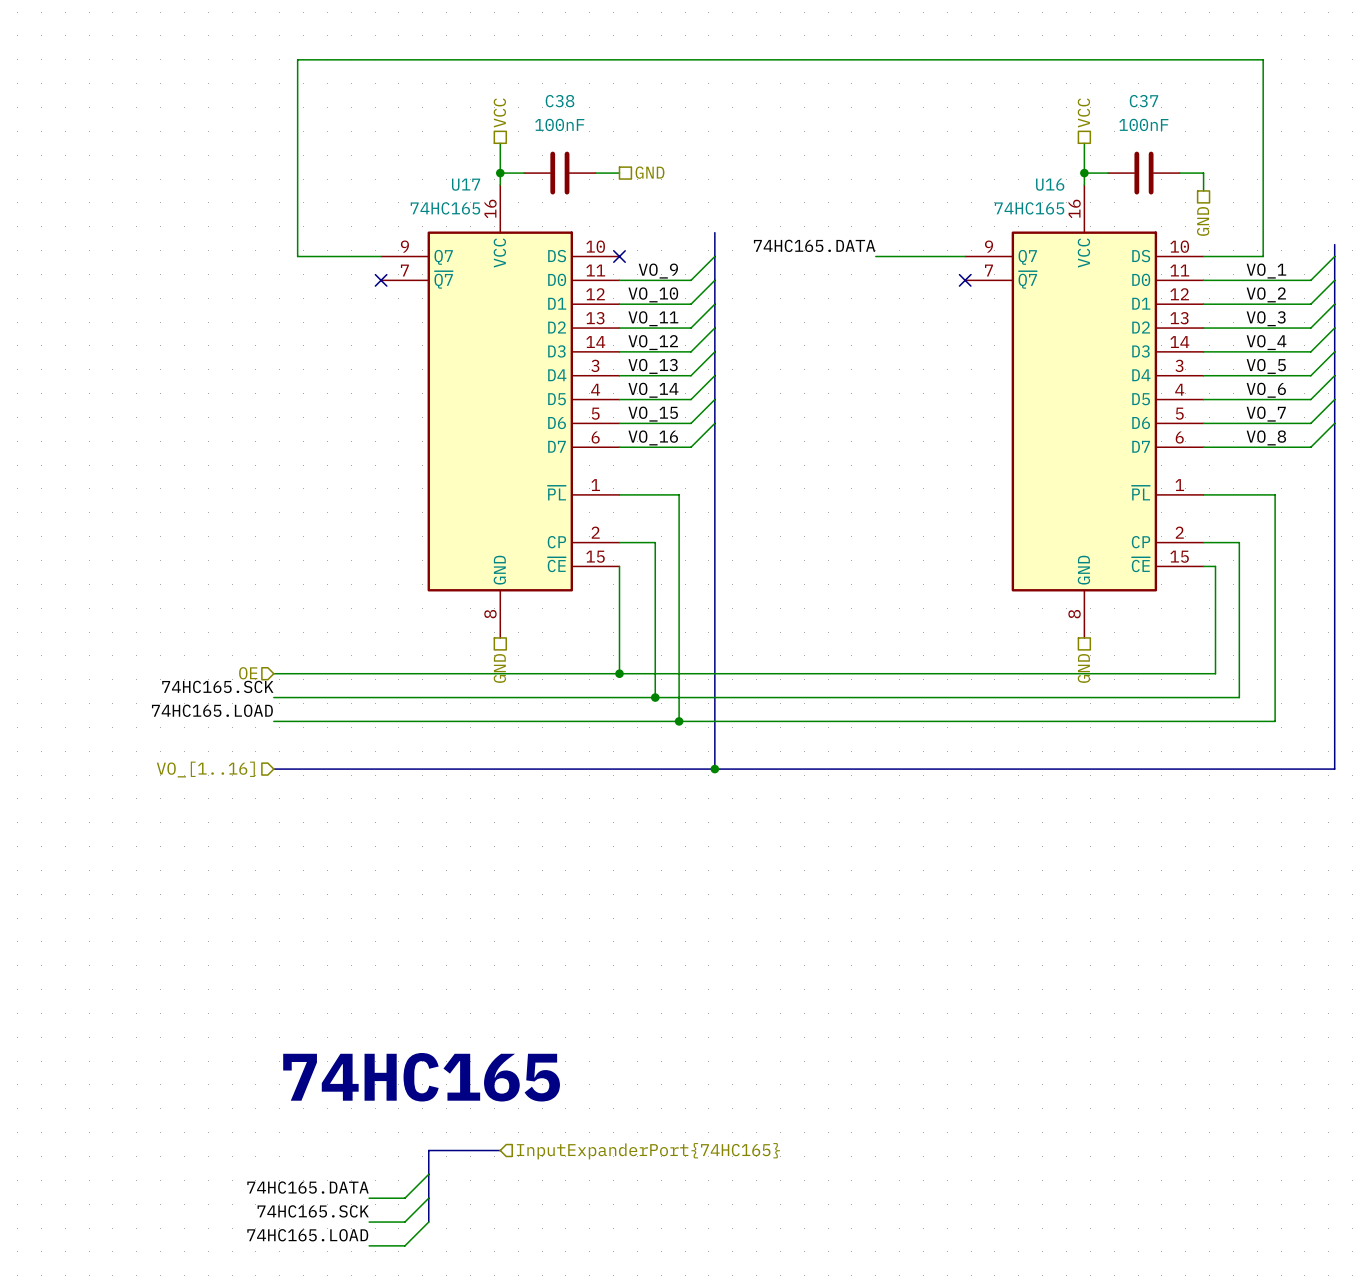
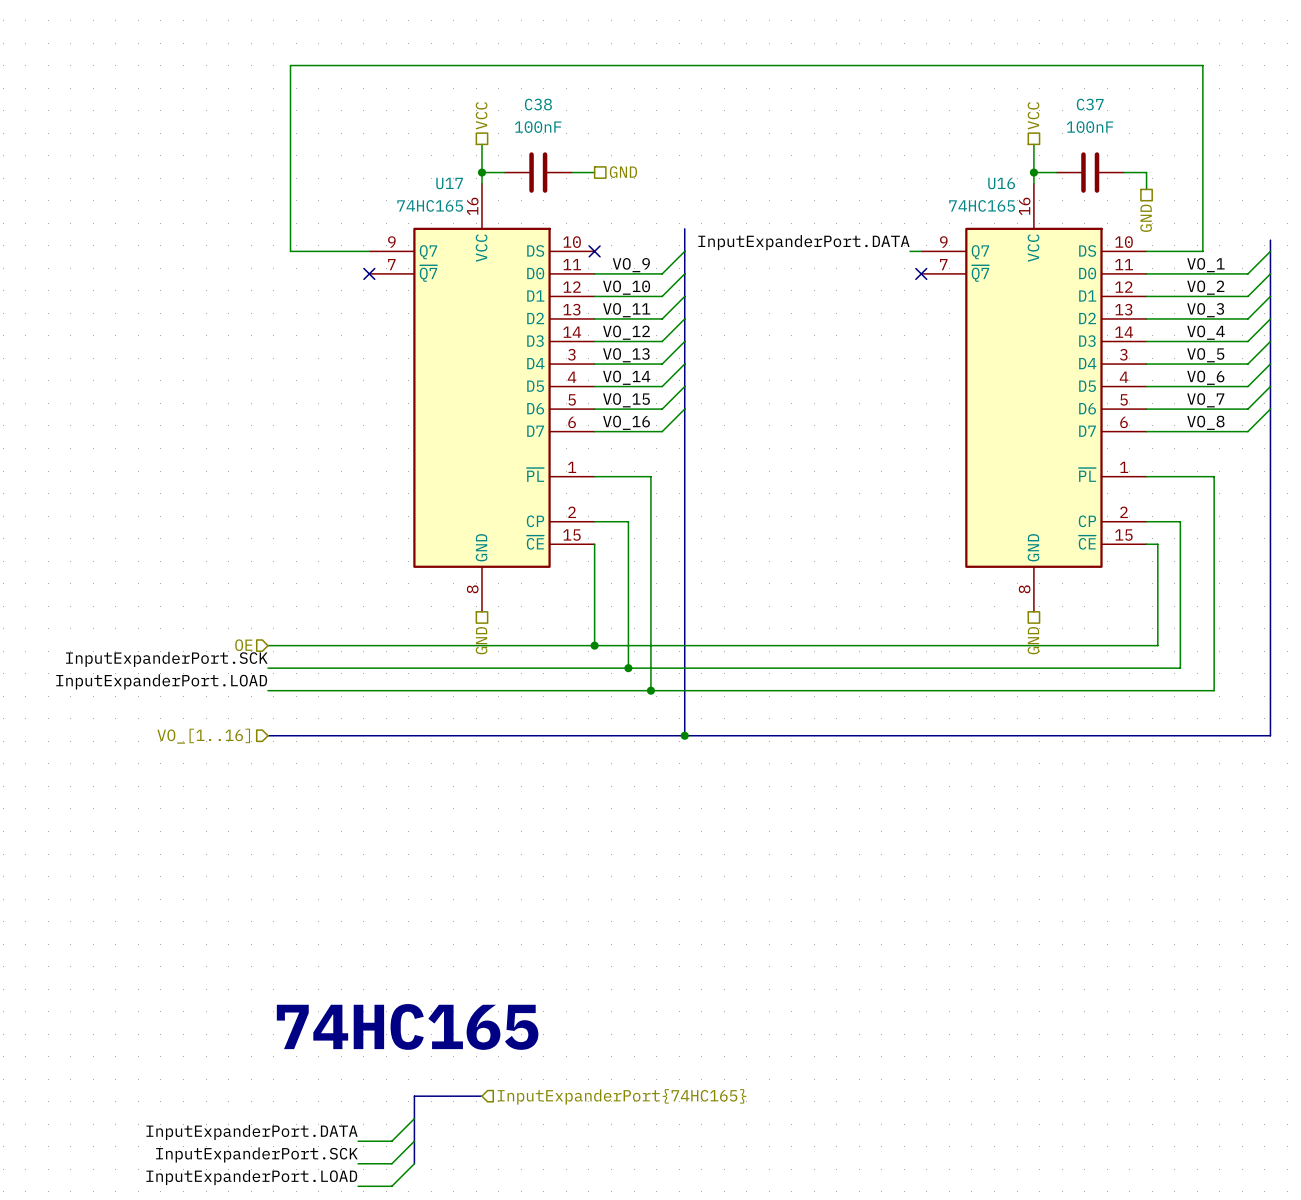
label: 74HC165.DATA (814, 245) -> none
label: none -> InputExpanderPort.DATA (803, 242)
wire: (875, 256) (953, 256) -> none
label: 74HC165.SCK (217, 686) -> InputExpanderPort.SCK (166, 659)
label: 74HC165.LOAD (212, 710) -> InputExpanderPort.LOAD (161, 681)
label: 74HC165.DATA (307, 1187) -> InputExpanderPort.DATA (252, 1132)
label: 74HC165.SCK (313, 1211) -> InputExpanderPort.SCK (256, 1154)
label: 74HC165.LOAD (307, 1235) -> InputExpanderPort.LOAD (251, 1177)

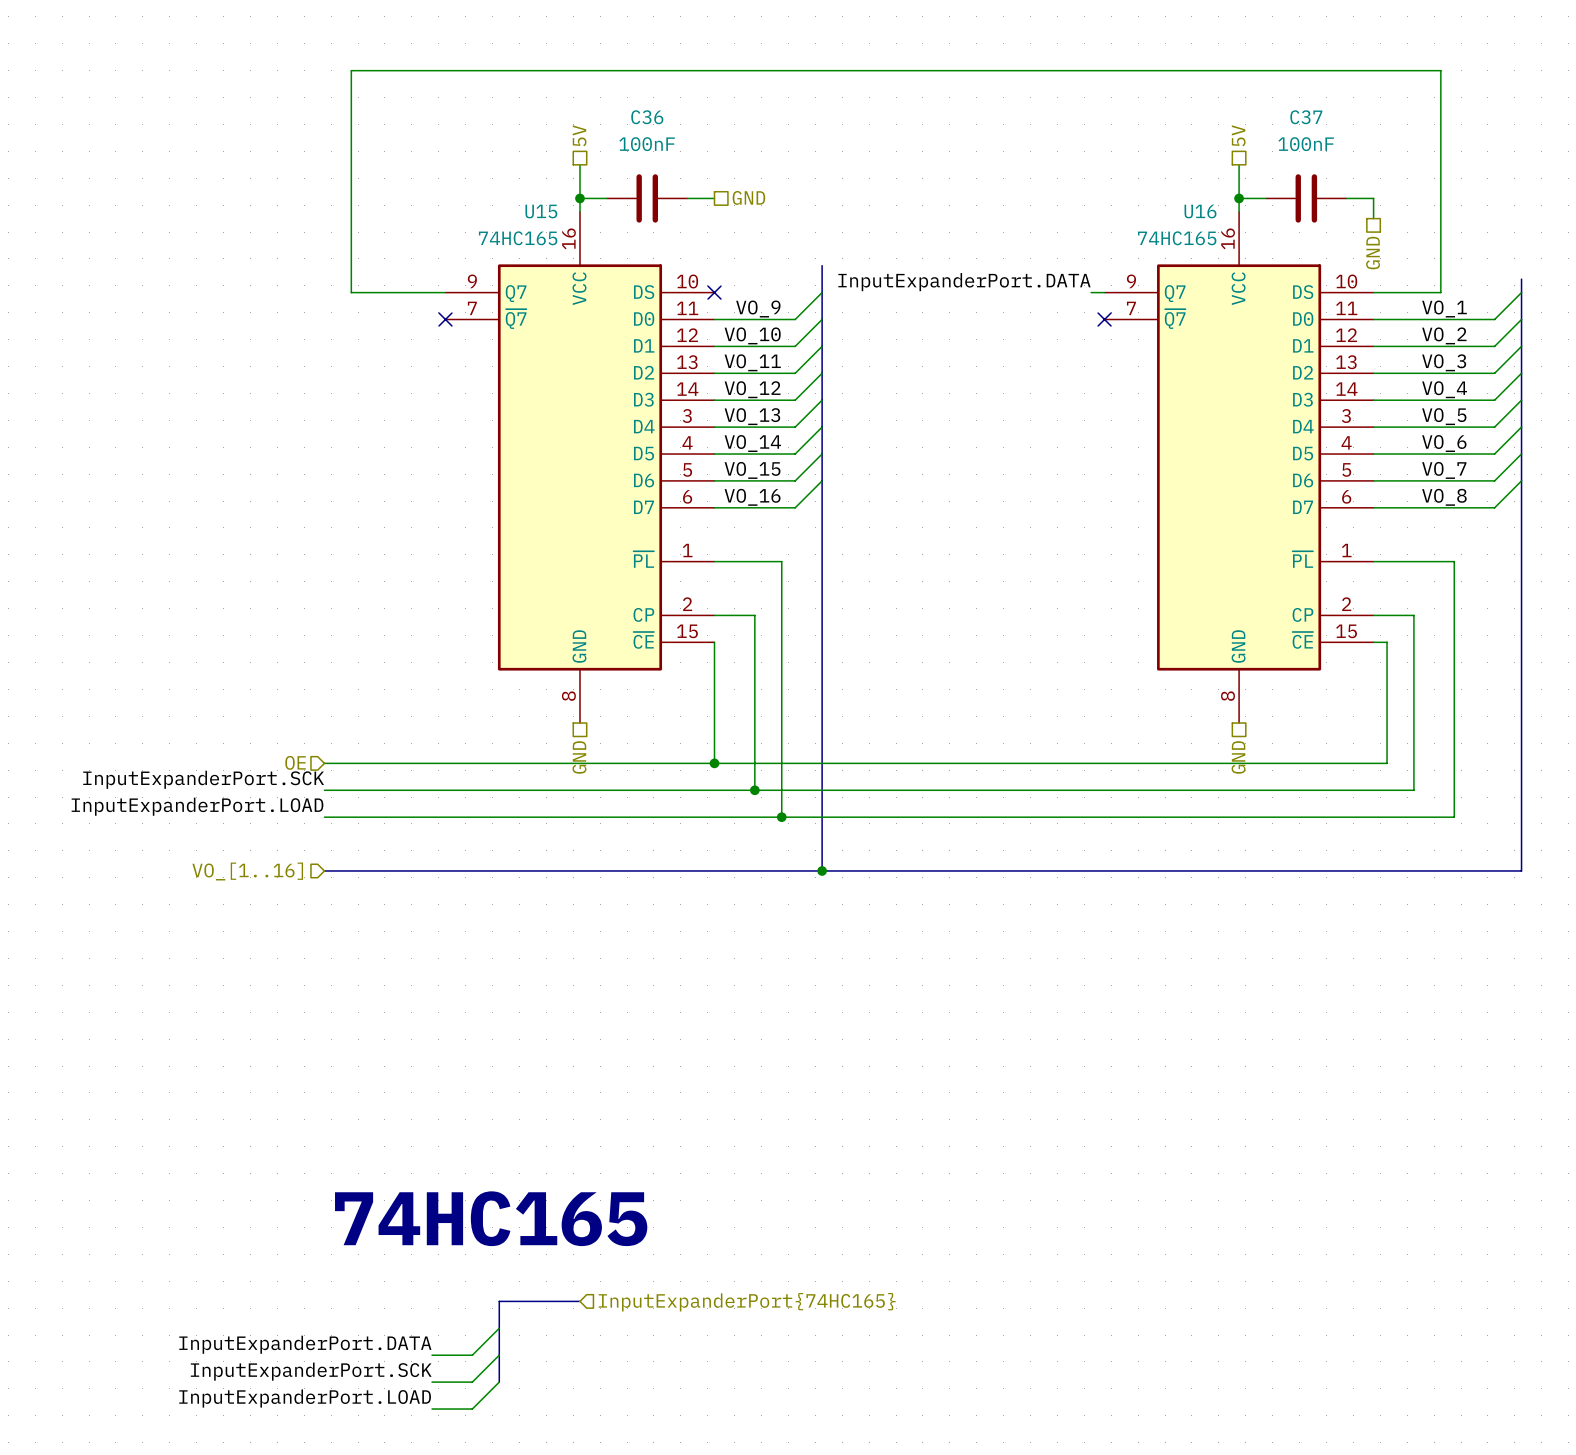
C38 name: C38 (538, 104) -> C36 (647, 117)
hierarchical label: VCC (481, 115) -> 5V (579, 135)
hierarchical label: VCC (1033, 115) -> 5V (1238, 135)
U17 name: U17 (449, 183) -> U15 (541, 211)

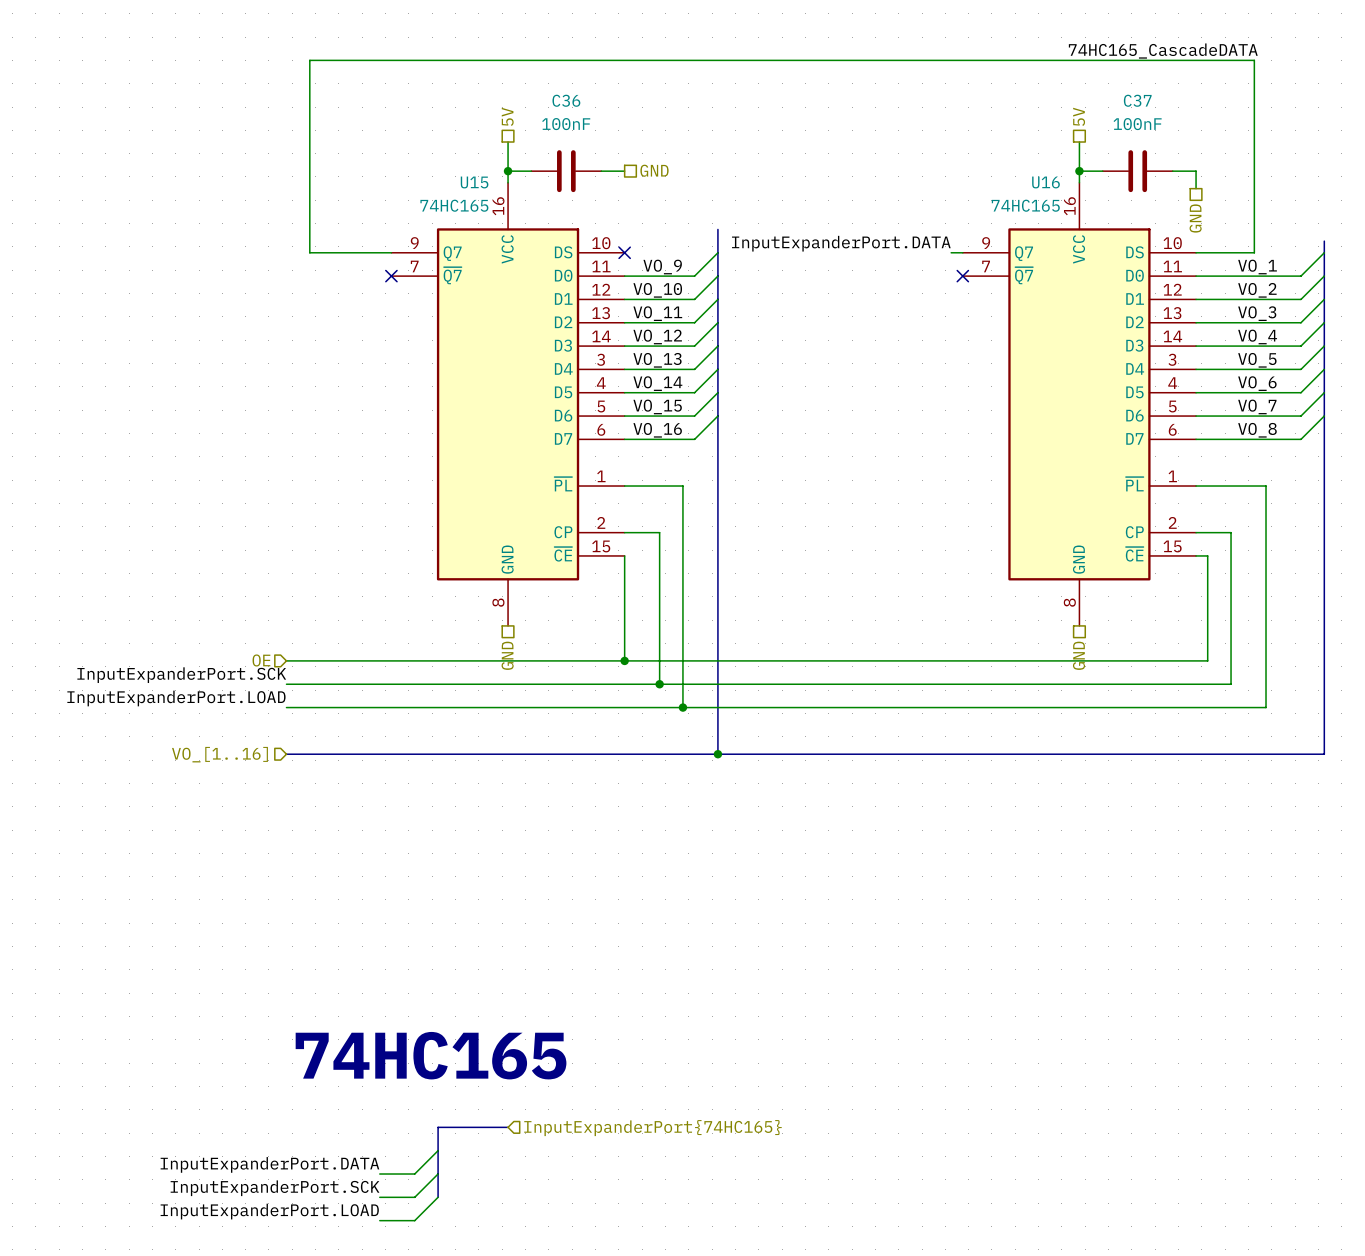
label: none -> 74HC165_CascadeDATA (1163, 51)

